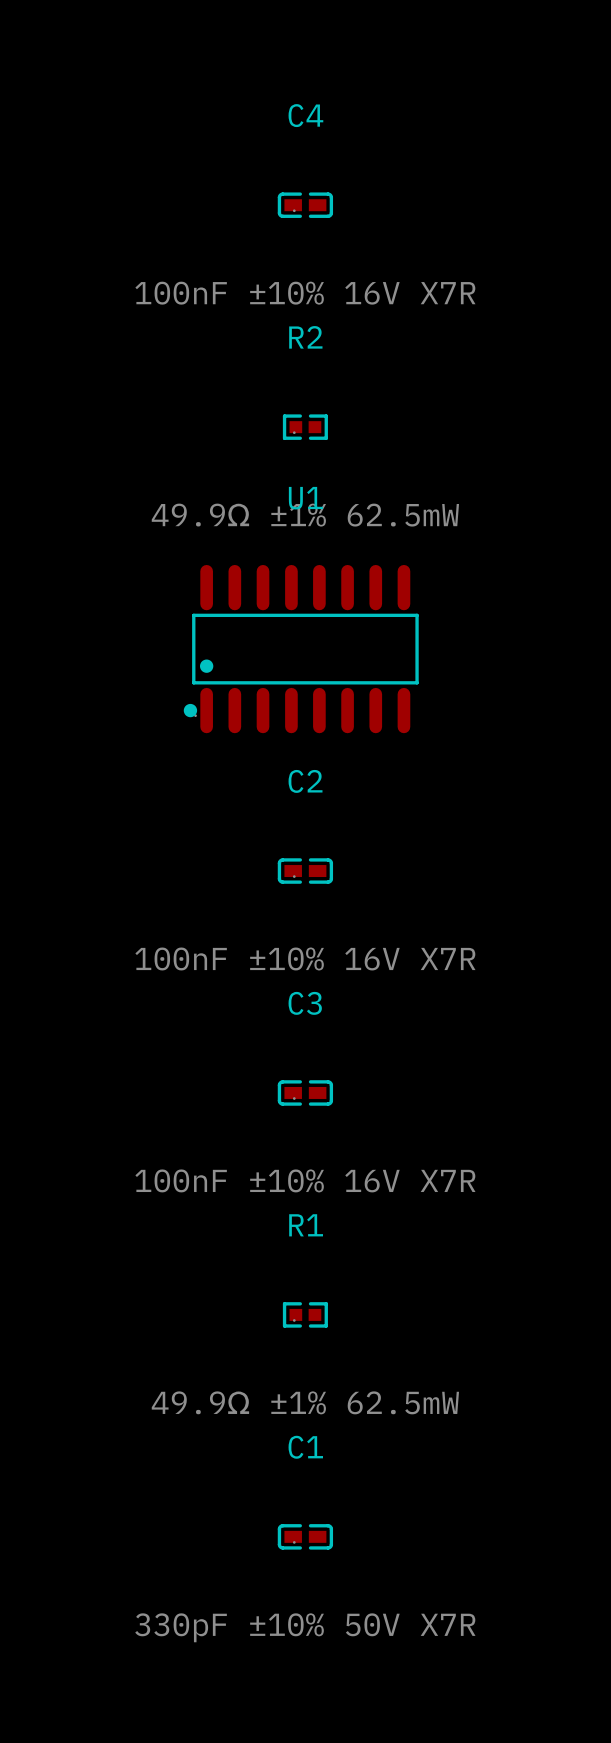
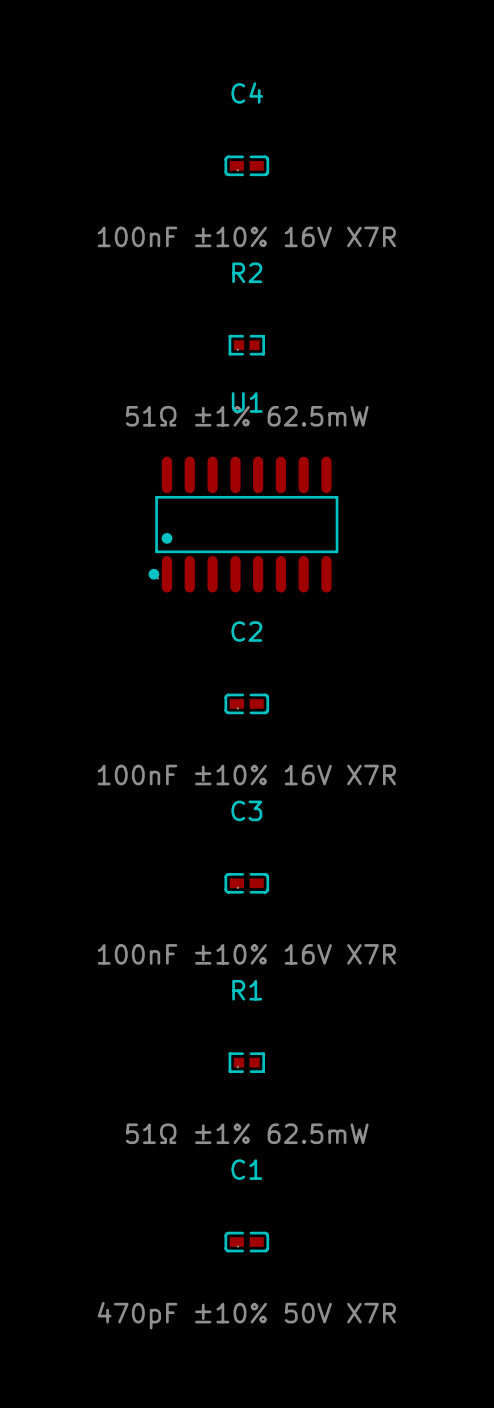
R2 value: 49.9Ω ±1% 62.5mW (305, 515) -> 51Ω ±1% 62.5mW (247, 416)
R1 value: 49.9Ω ±1% 62.5mW (305, 1402) -> 51Ω ±1% 62.5mW (247, 1133)
C1 value: 330pF ±10% 50V X7R (305, 1627) -> 470pF ±10% 50V X7R (246, 1315)

